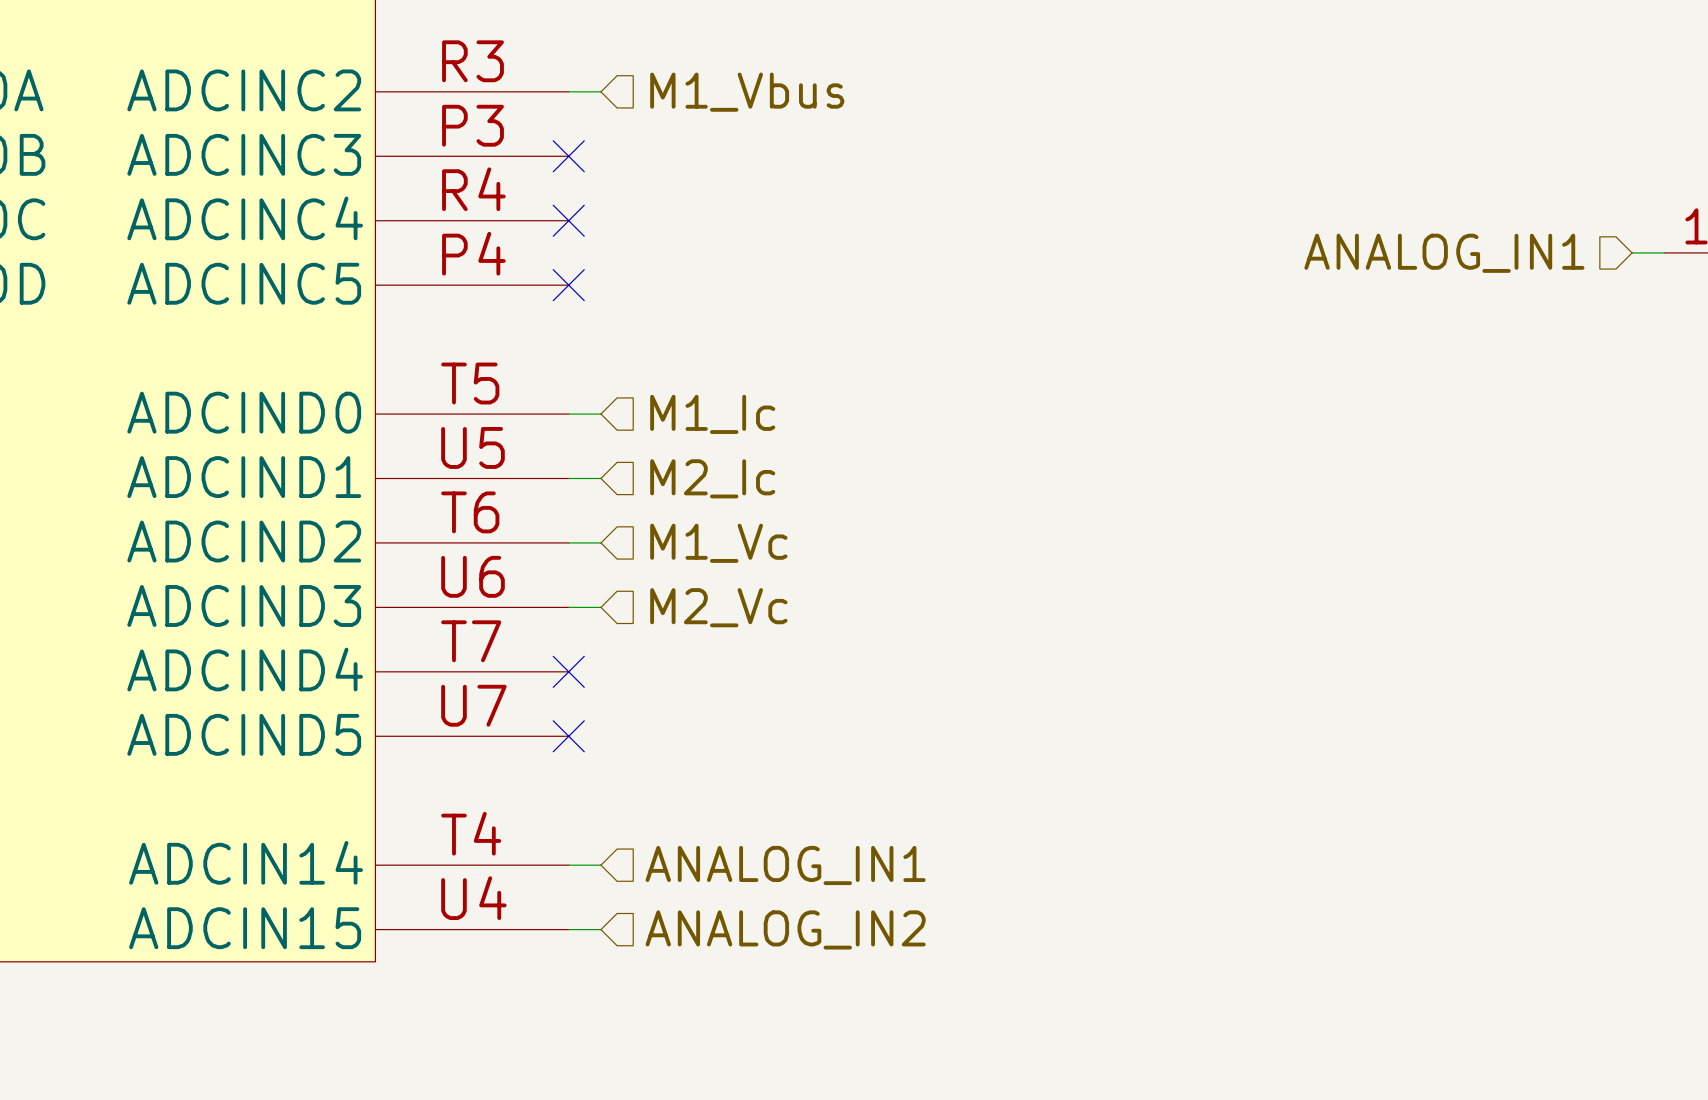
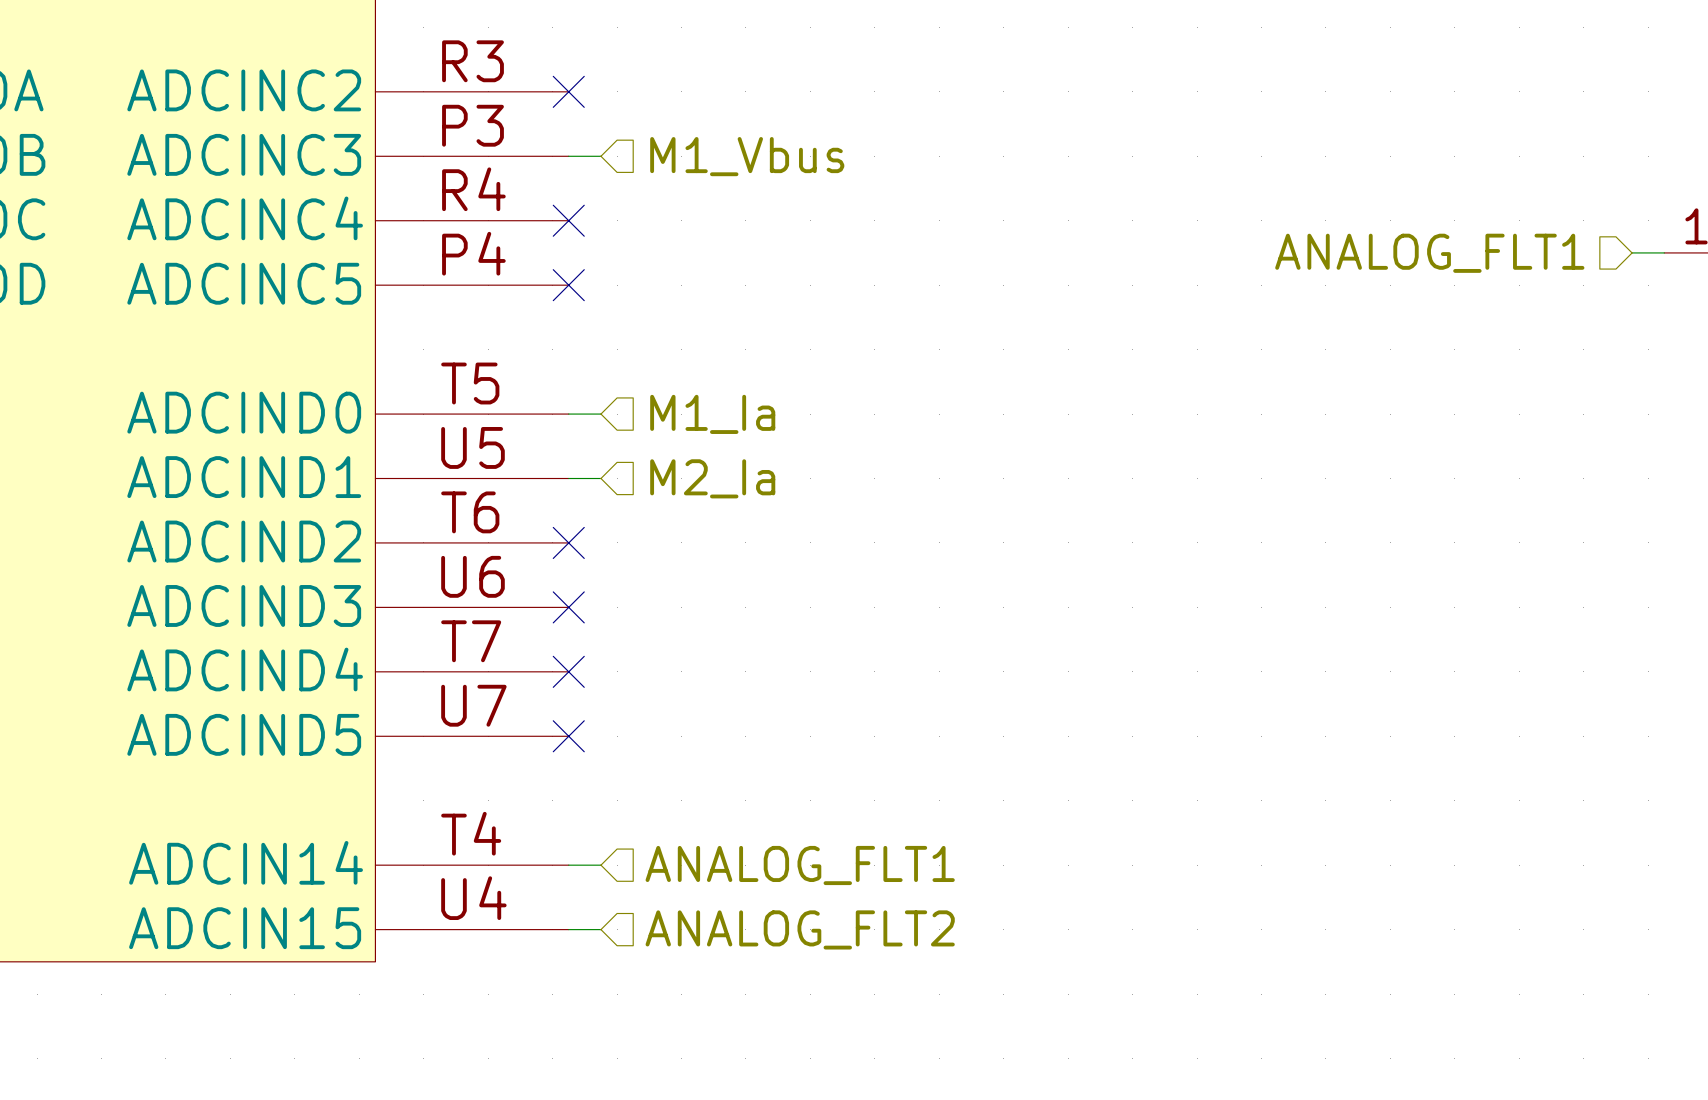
wire: (568, 91) (600, 91) -> (568, 156) (600, 156)
hierarchical label position: M1_Vbus (747, 92) -> M1_Vbus (747, 156)
no-connect mark position: (568, 156) -> (568, 91)
hierarchical label: ANALOG_IN1 (1444, 253) -> ANALOG_FLT1 (1429, 253)
hierarchical label: M1_Ic (712, 414) -> M1_Ia (712, 414)
hierarchical label: M2_Ic (712, 478) -> M2_Ia (712, 478)
wire: (568, 542) (600, 542) -> none
no-connect mark: none -> (568, 542)
hierarchical label: M1_Vc (718, 543) -> none
wire: (568, 607) (600, 607) -> none
no-connect mark: none -> (568, 607)
hierarchical label: M2_Vc (718, 607) -> none
hierarchical label: ANALOG_IN1 (785, 865) -> ANALOG_FLT1 (800, 865)
hierarchical label: ANALOG_IN2 (785, 929) -> ANALOG_FLT2 (800, 929)

